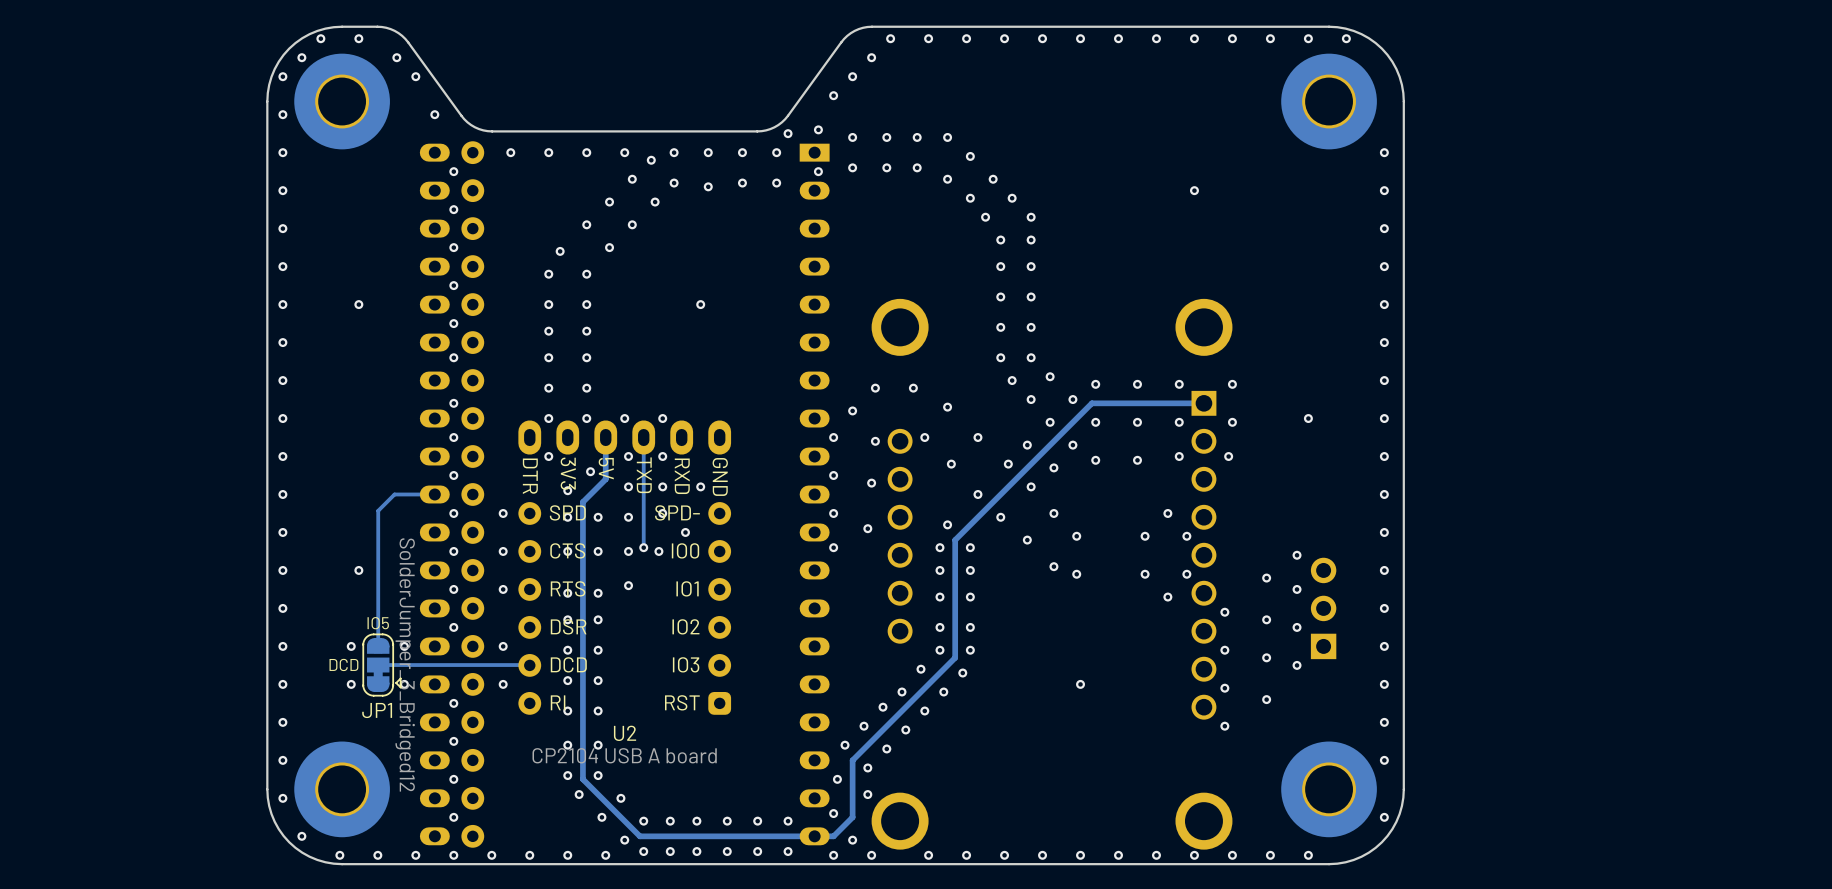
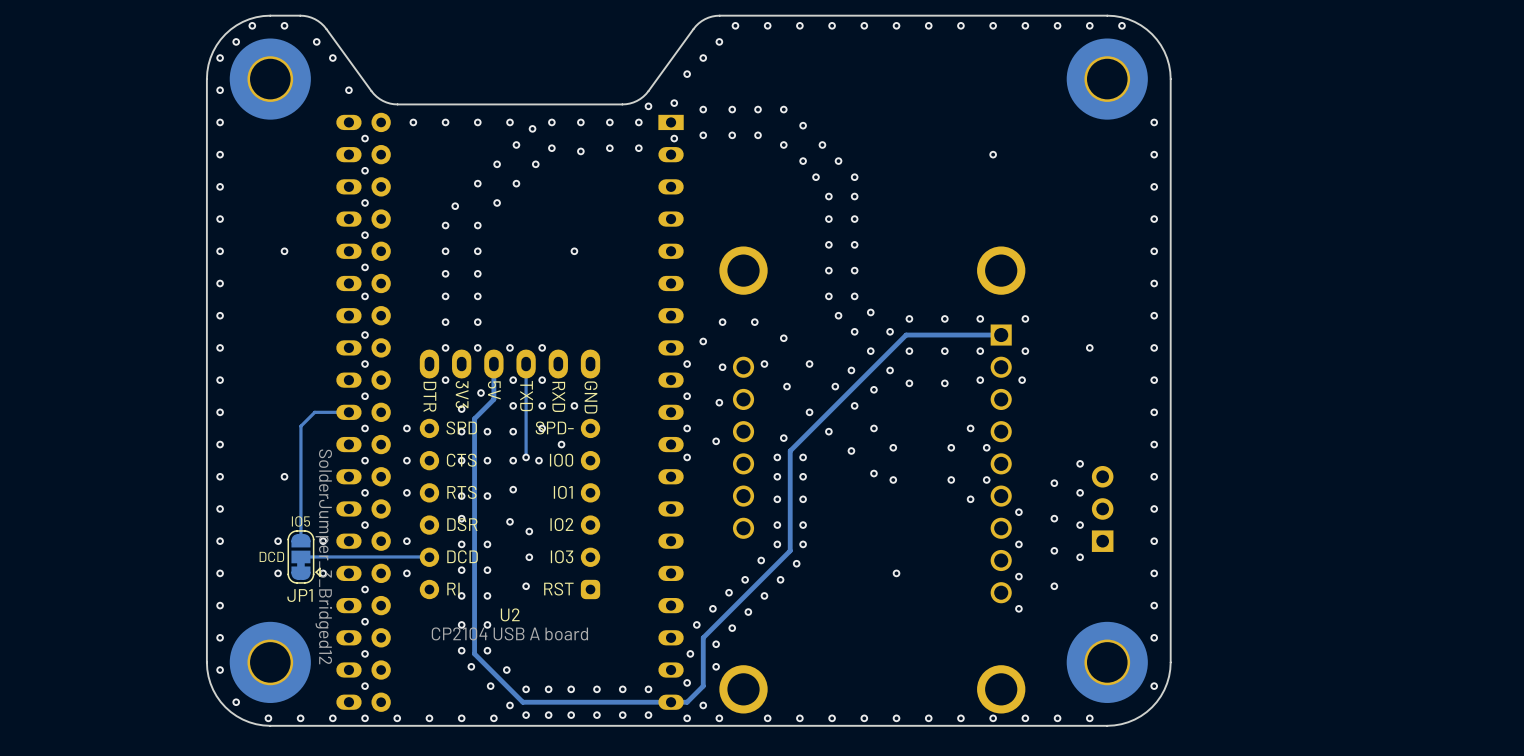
via: (598, 619) -> none
via: none -> (509, 521)
via: none -> (529, 531)
via: none -> (529, 557)
via: none -> (526, 586)

